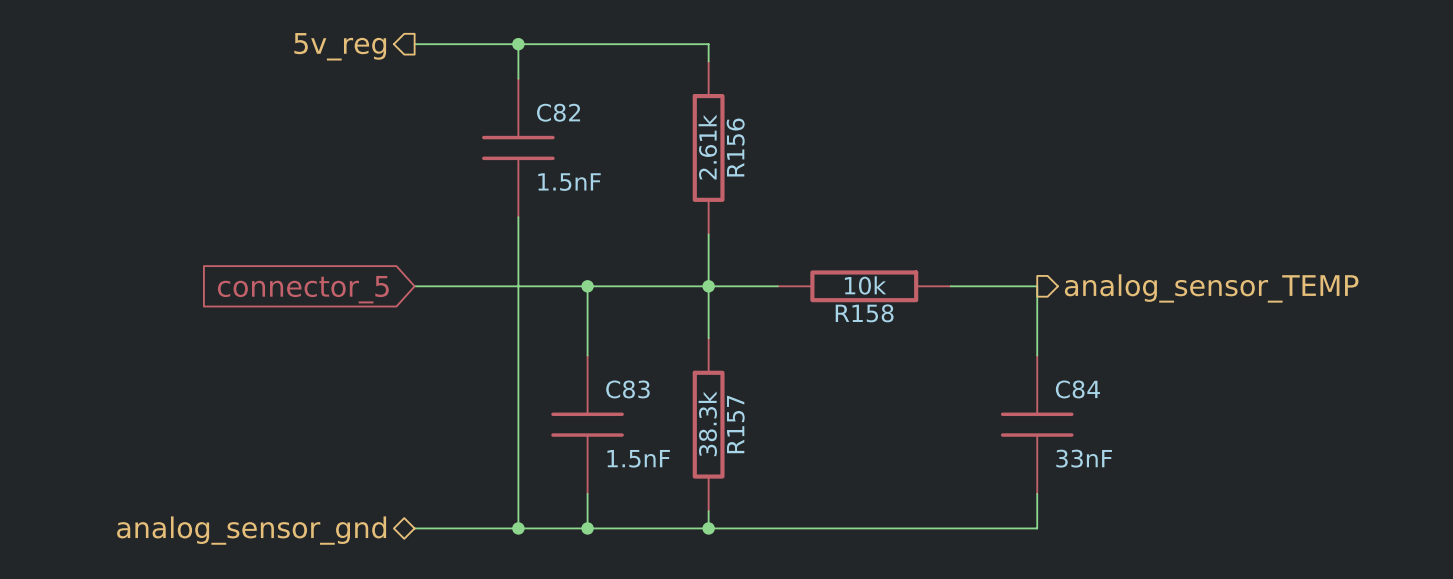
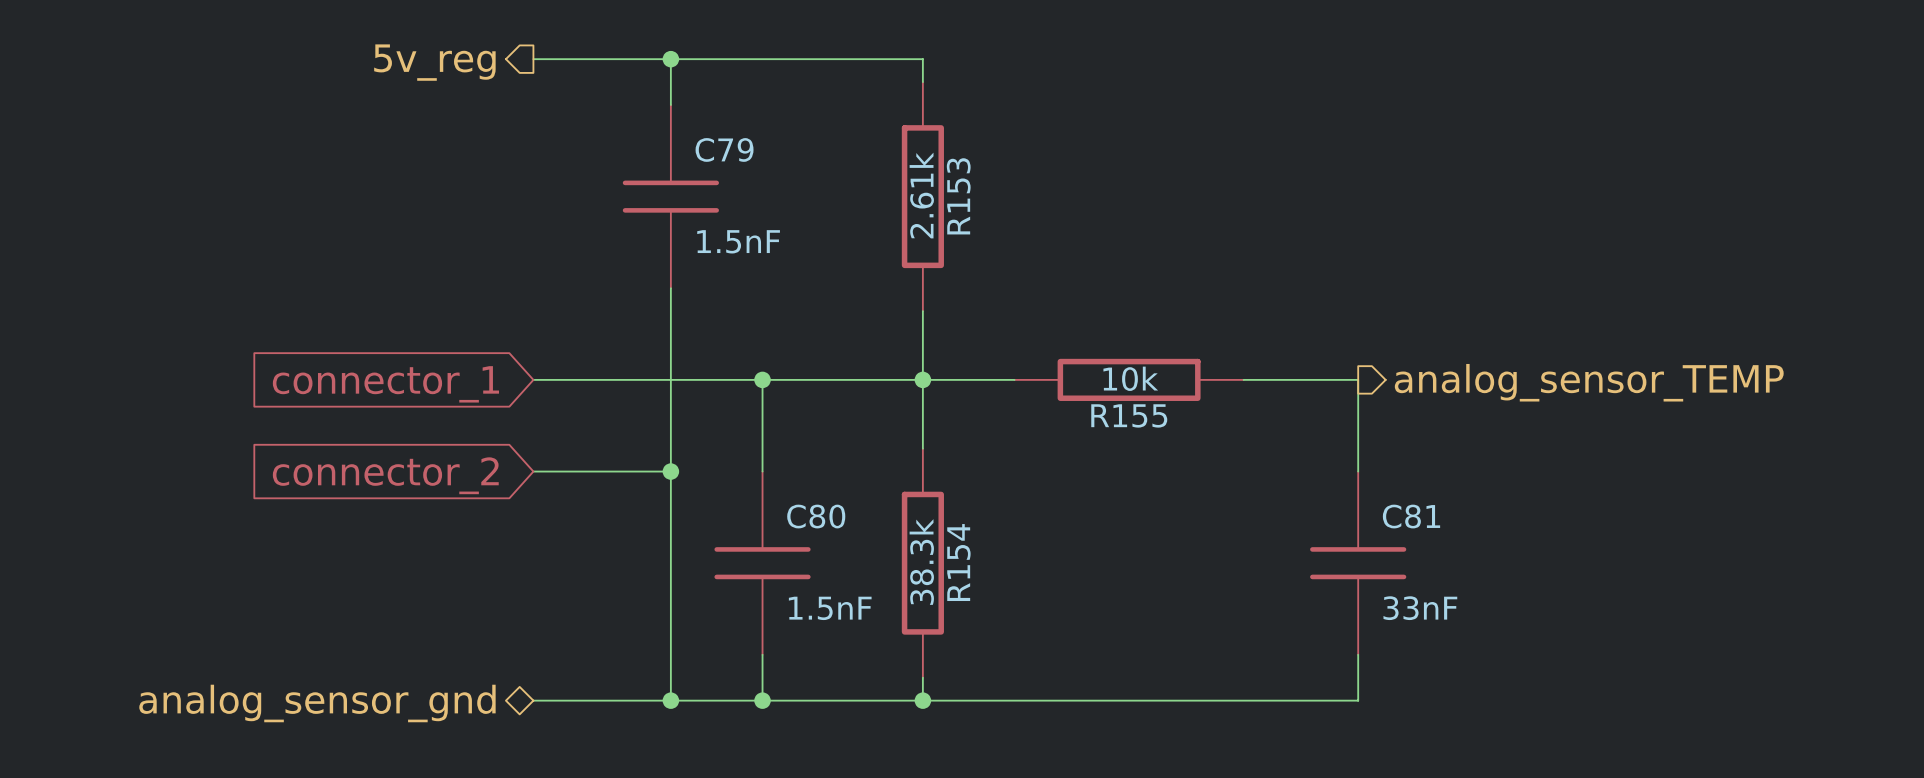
C82 name: C82 (558, 112) -> C79 (724, 149)
R156 name: R156 (735, 147) -> R153 (958, 196)
global label: connector_5 (303, 289) -> connector_1 (385, 384)
R158 name: R158 (864, 313) -> R155 (1129, 415)
wire: none -> (533, 471) (670, 471)
junction: none -> (670, 471)
global label: none -> connector_2 (385, 475)
C83 name: C83 (627, 389) -> C80 (816, 516)
C84 name: C84 (1077, 389) -> C81 (1411, 516)
R157 name: R157 (735, 424) -> R154 (958, 562)

